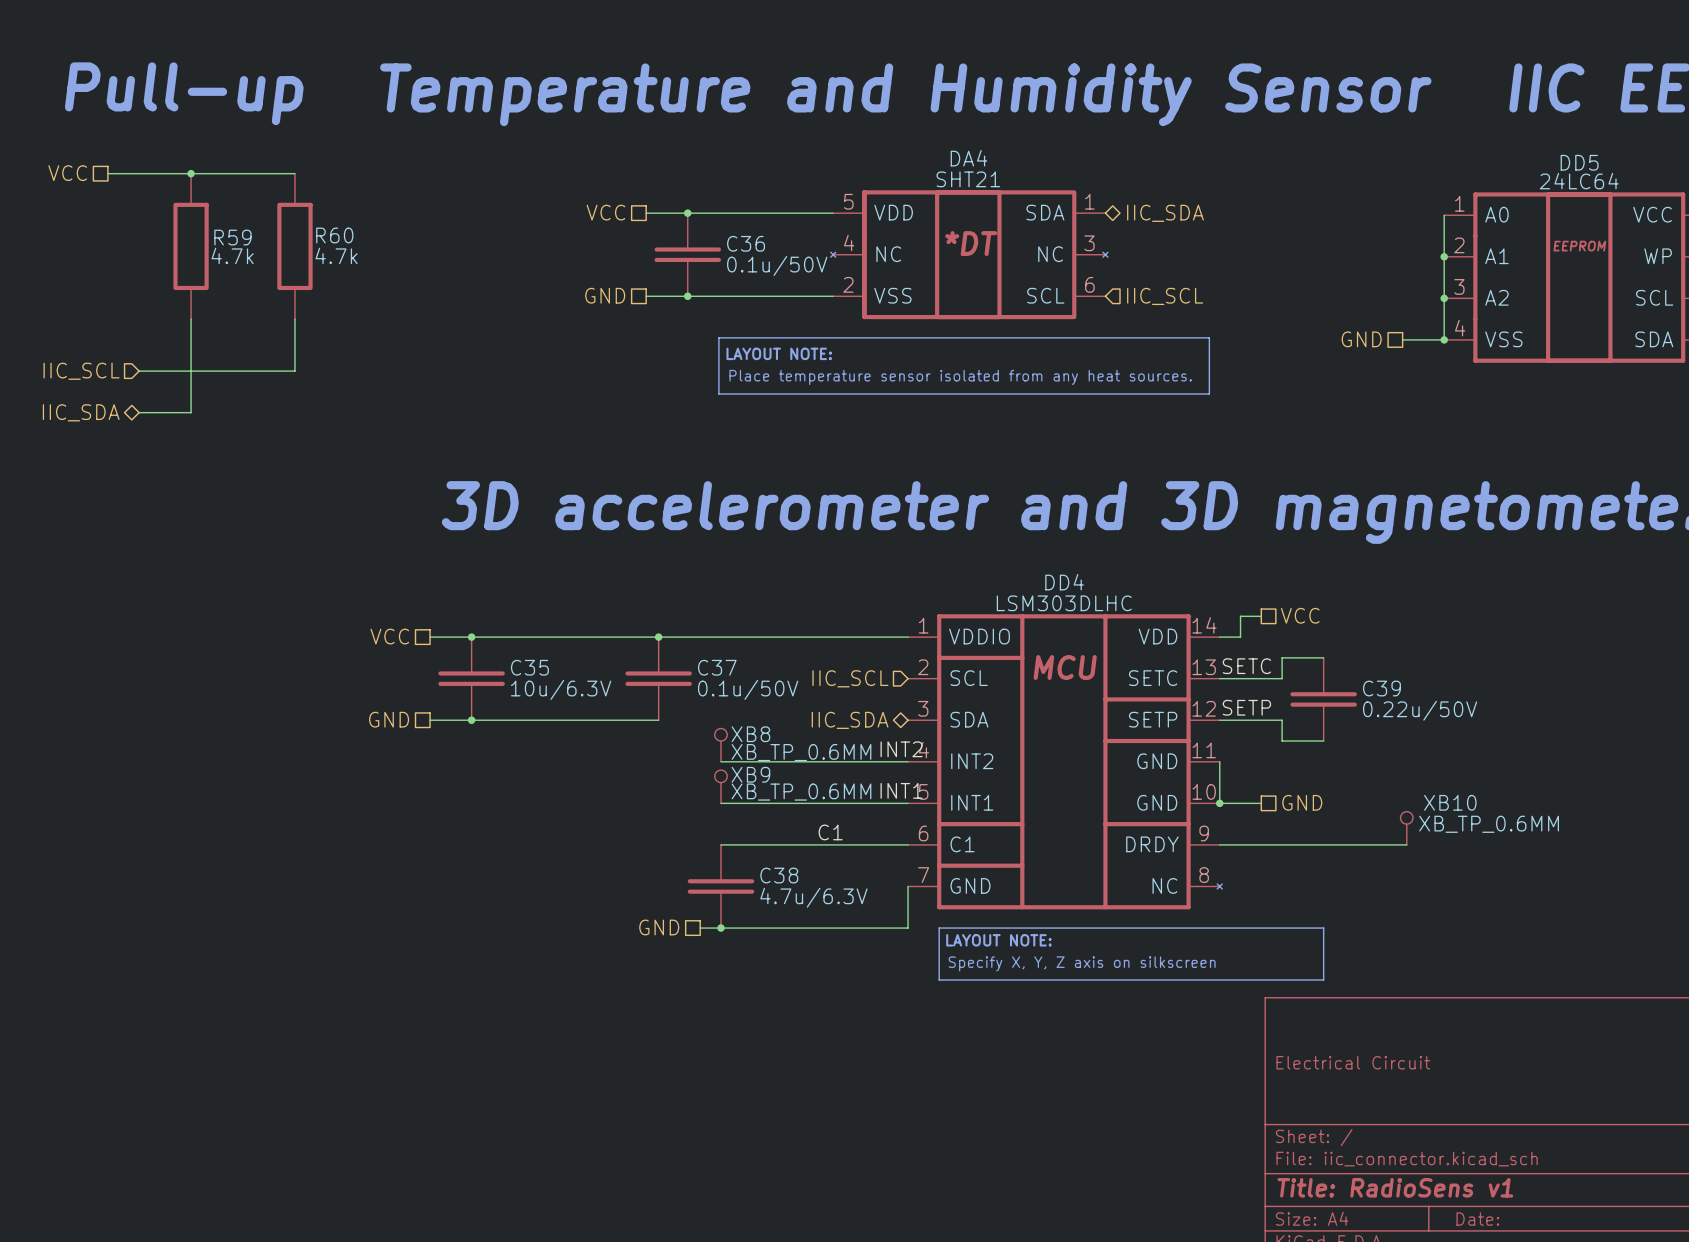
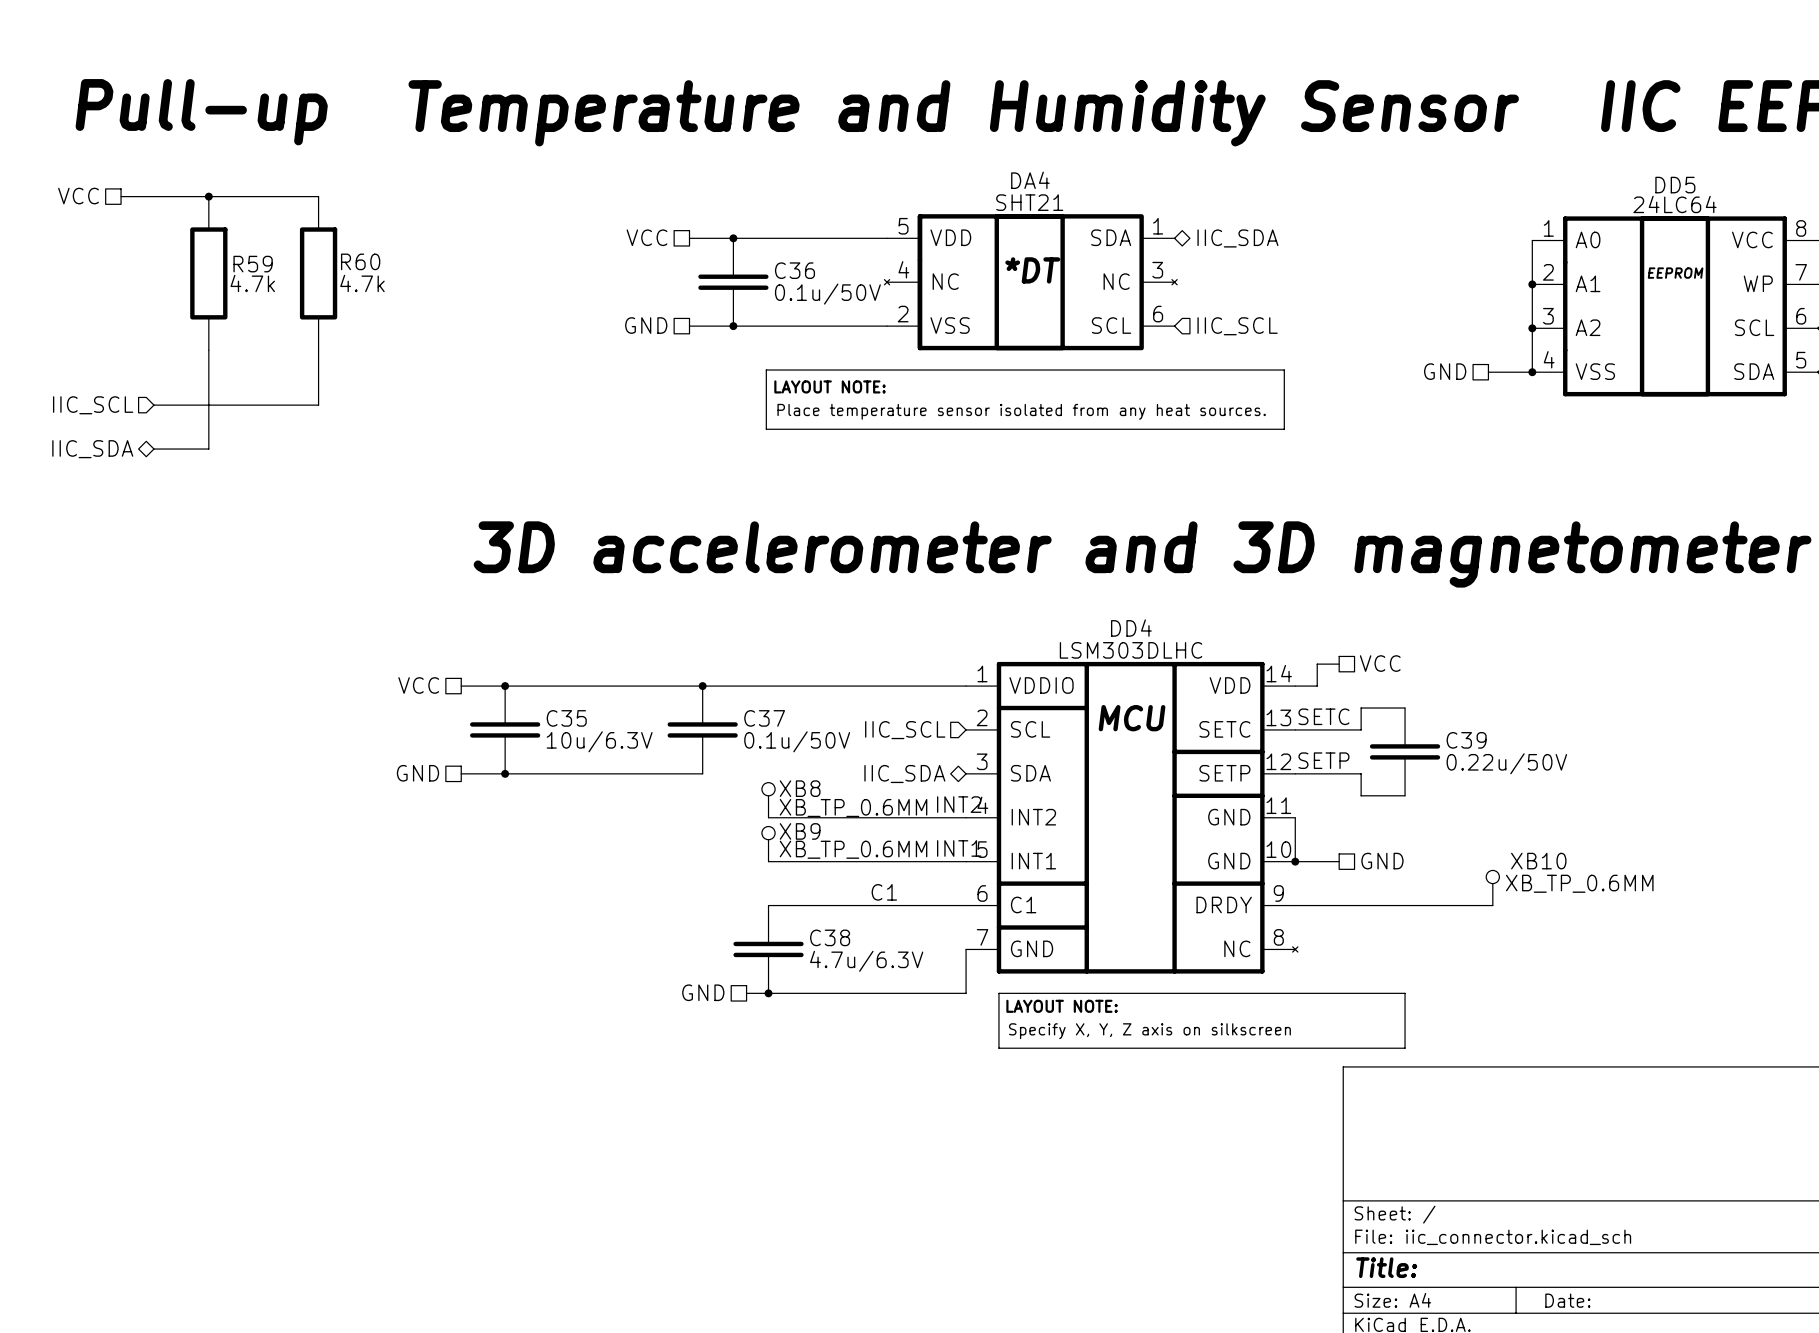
title block: Electrical Circuit (1353, 1062) -> none
title block: Title: RadioSens v1 (1395, 1187) -> Title: (1386, 1267)

